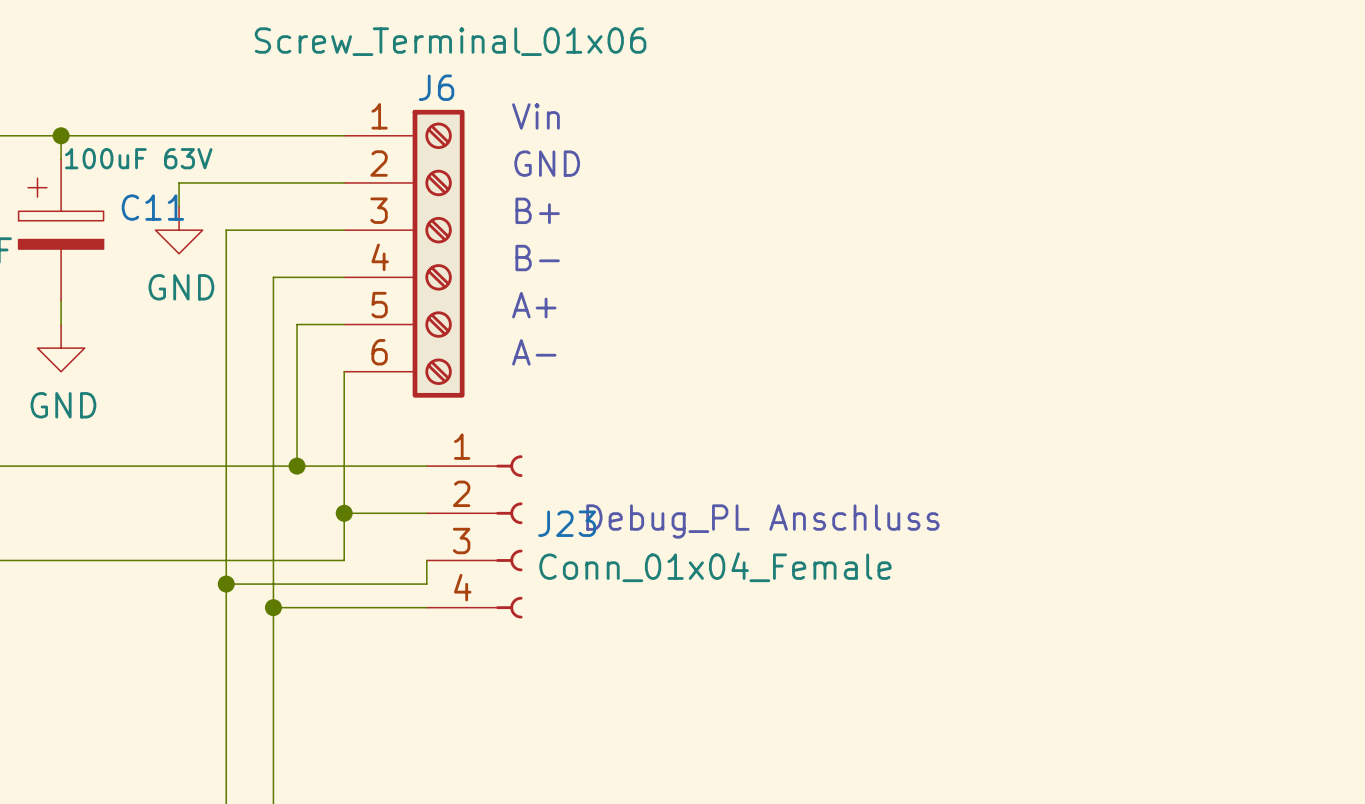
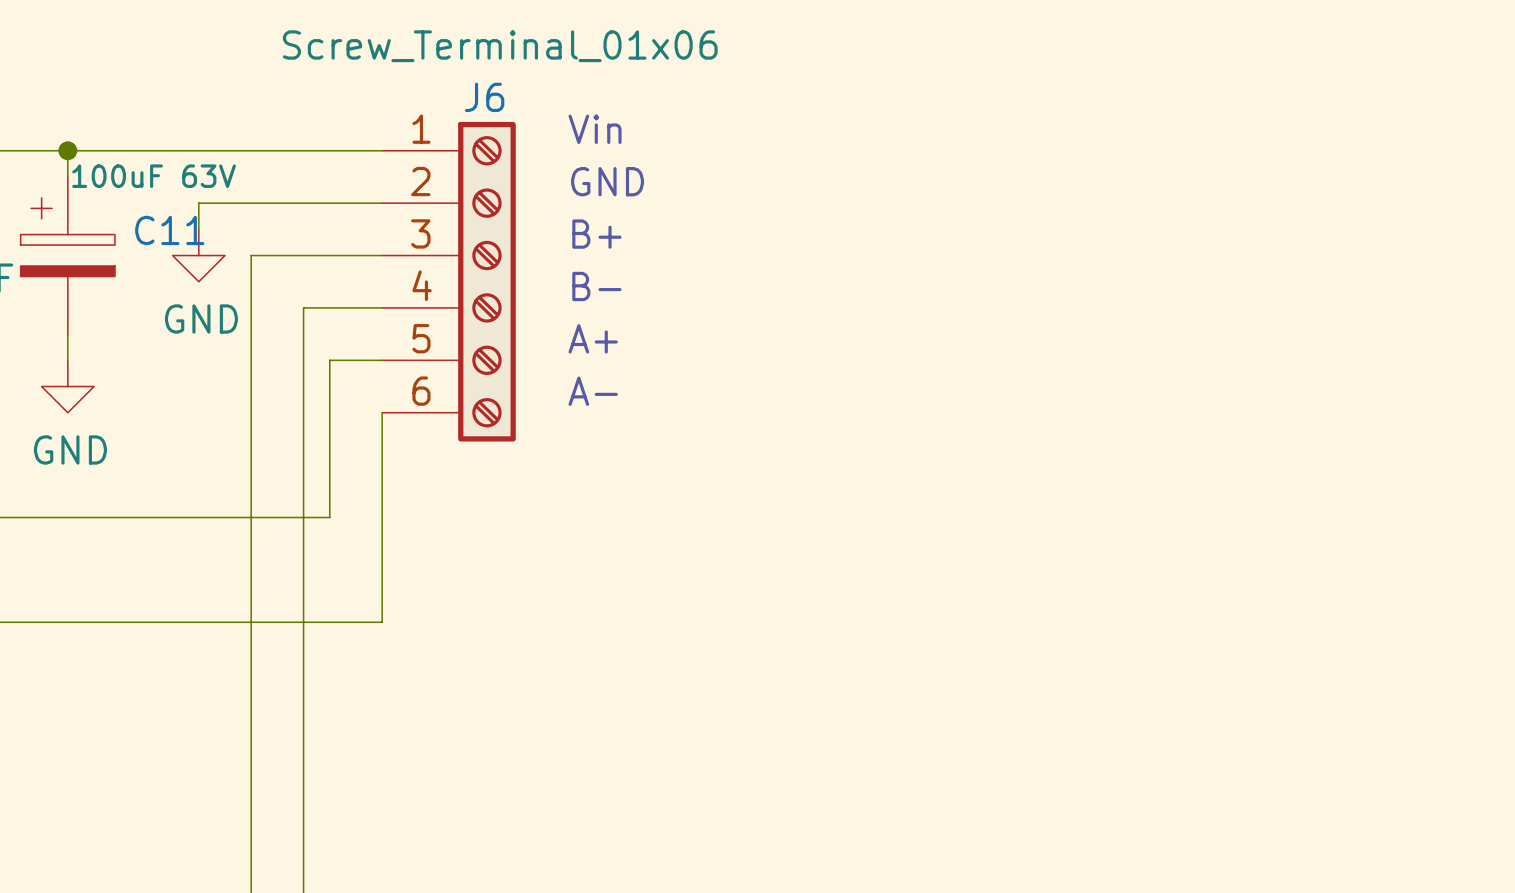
wire: (297, 466) (426, 466) -> none
junction: (297, 466) -> none
wire: (344, 513) (426, 513) -> none
junction: (344, 513) -> none
text: Debug_PL Anschluss (762, 521) -> none
J23: Conn_01x04_Female (474, 536) -> none
wire: (426, 560) (426, 584) (226, 584) -> none
junction: (226, 584) -> none
wire: (273, 607) (426, 607) -> none
junction: (273, 607) -> none

